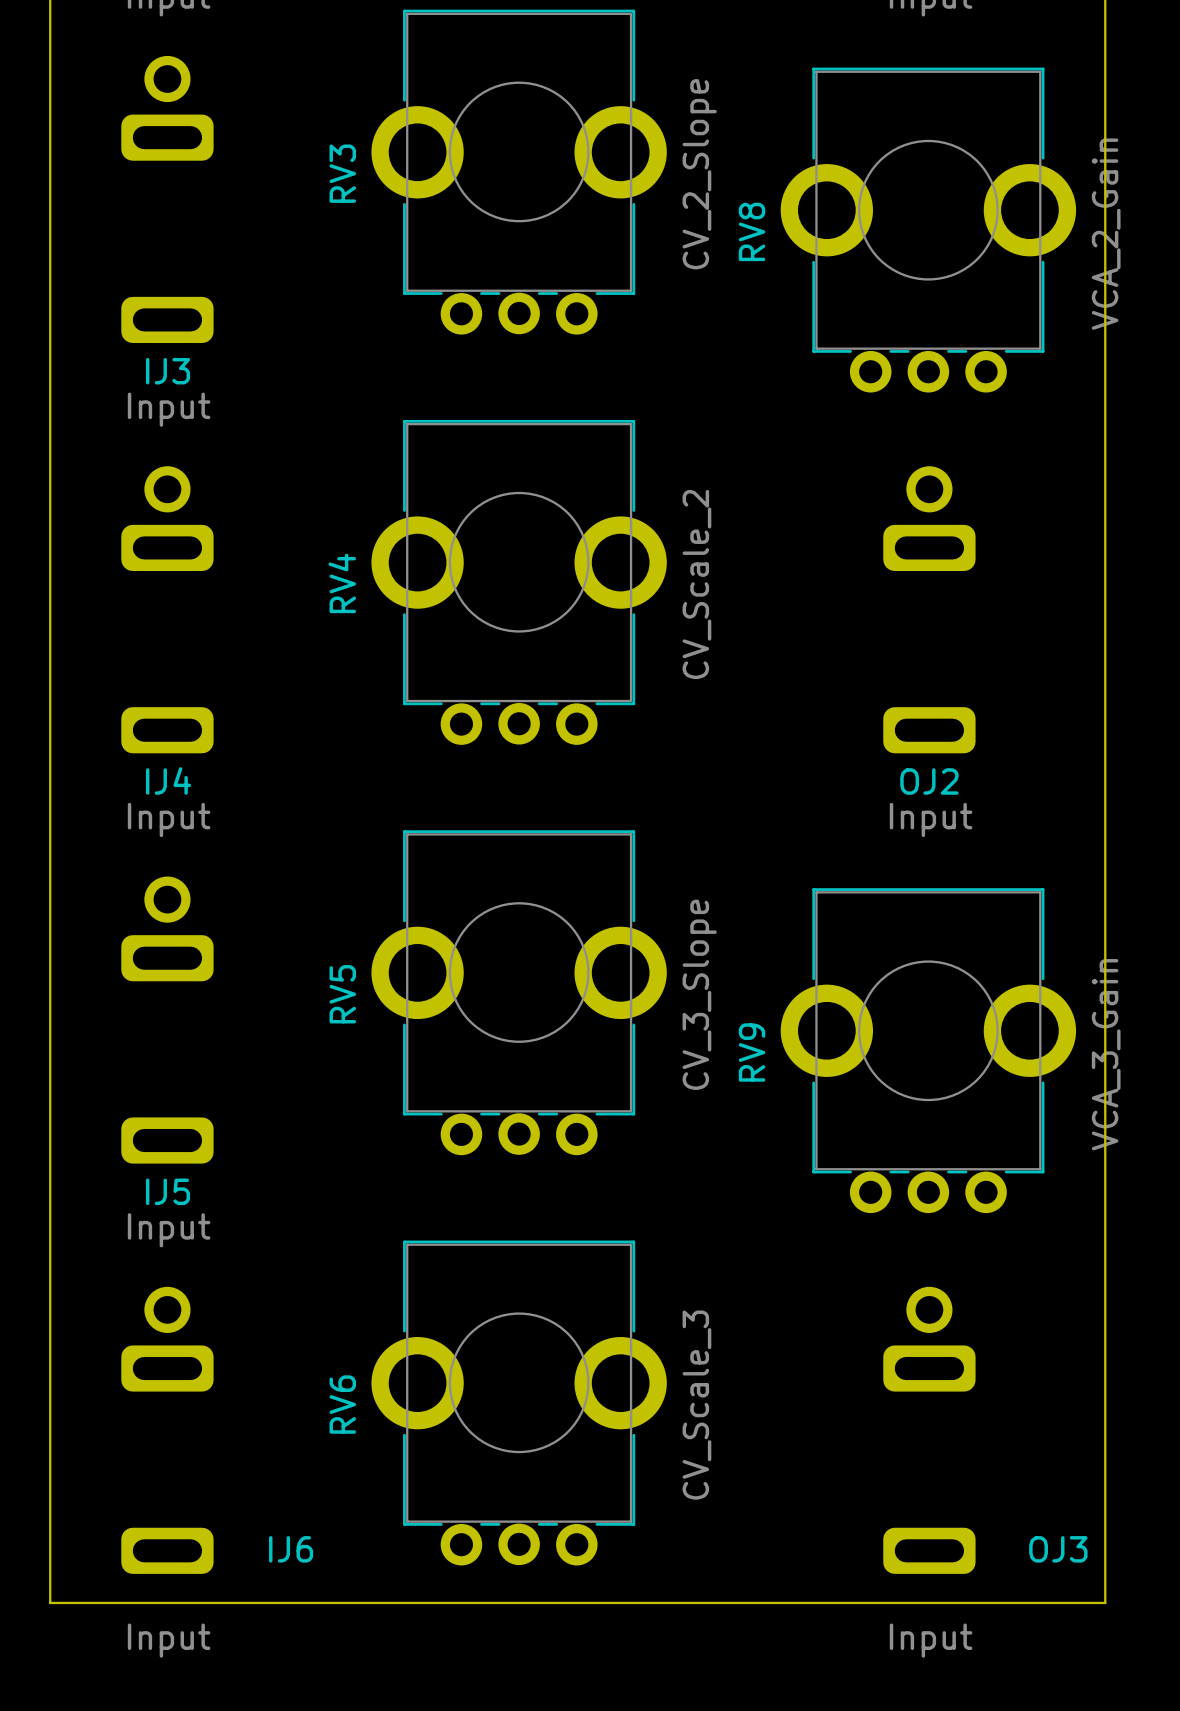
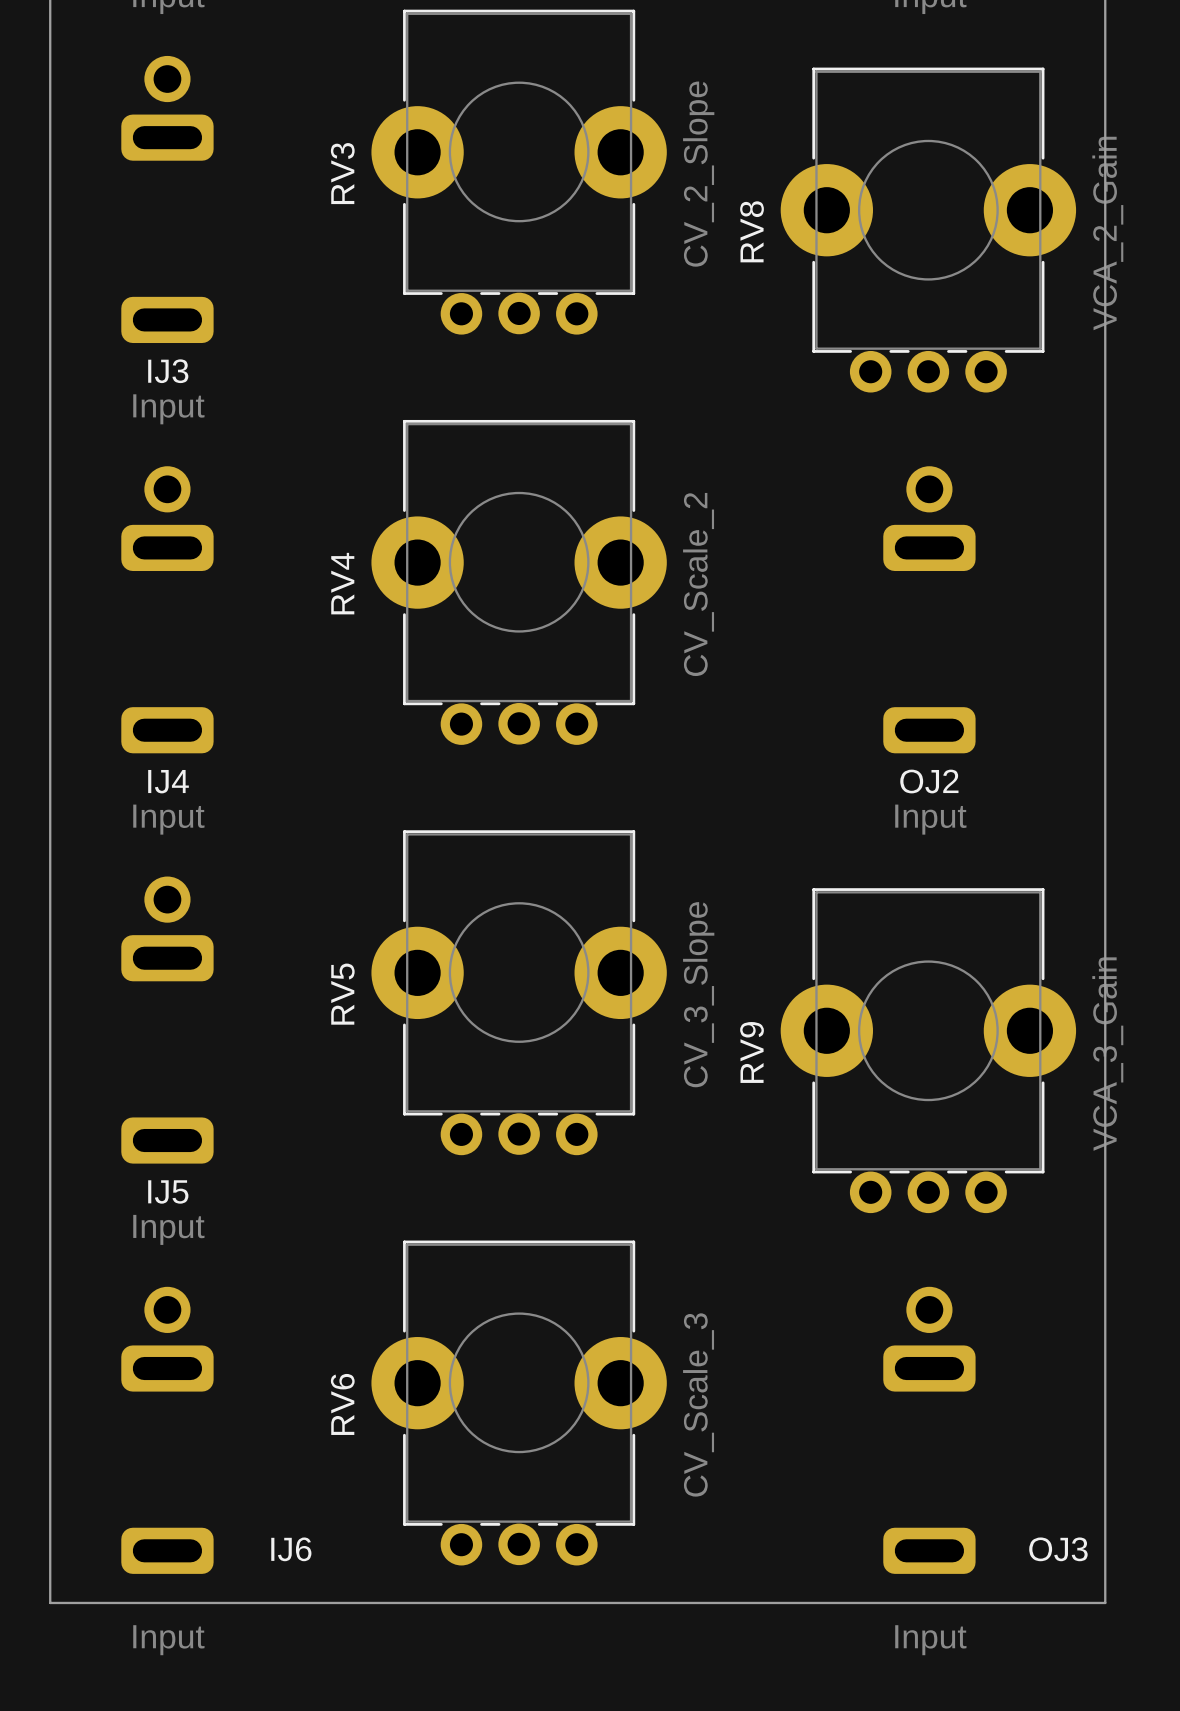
RV3 footprint: [371, 9, 667, 335] -> [371, 9, 667, 335]
RV8 footprint: [780, 67, 1077, 393] -> [780, 67, 1077, 393]
RV4 footprint: [371, 419, 667, 745] -> [371, 419, 667, 745]
RV5 footprint: [371, 830, 667, 1156] -> [371, 830, 667, 1156]
RV9 footprint: [780, 888, 1077, 1214] -> [780, 888, 1077, 1214]
RV6 footprint: [371, 1240, 667, 1566] -> [371, 1240, 667, 1566]

